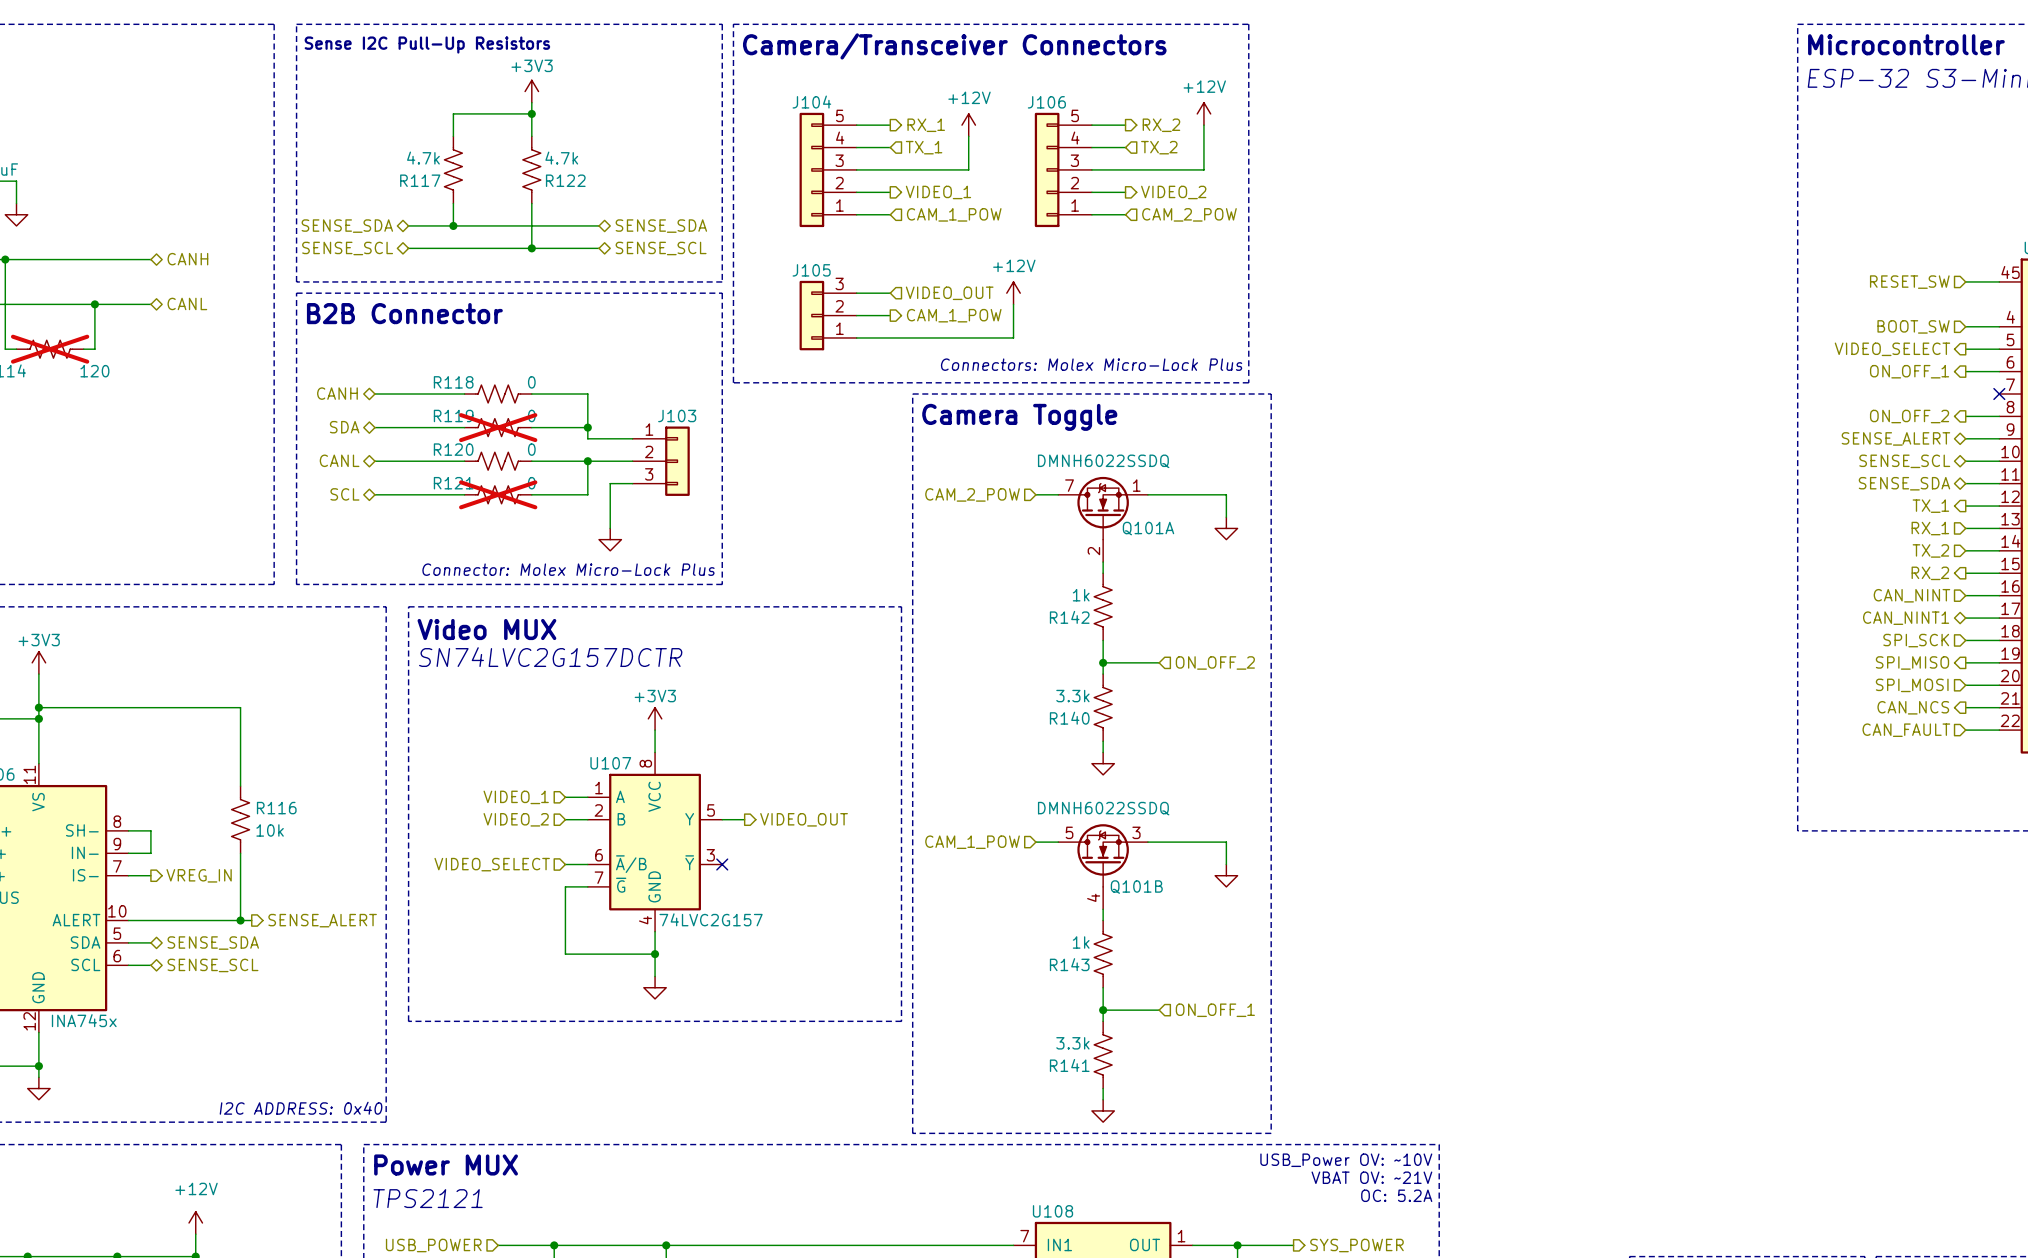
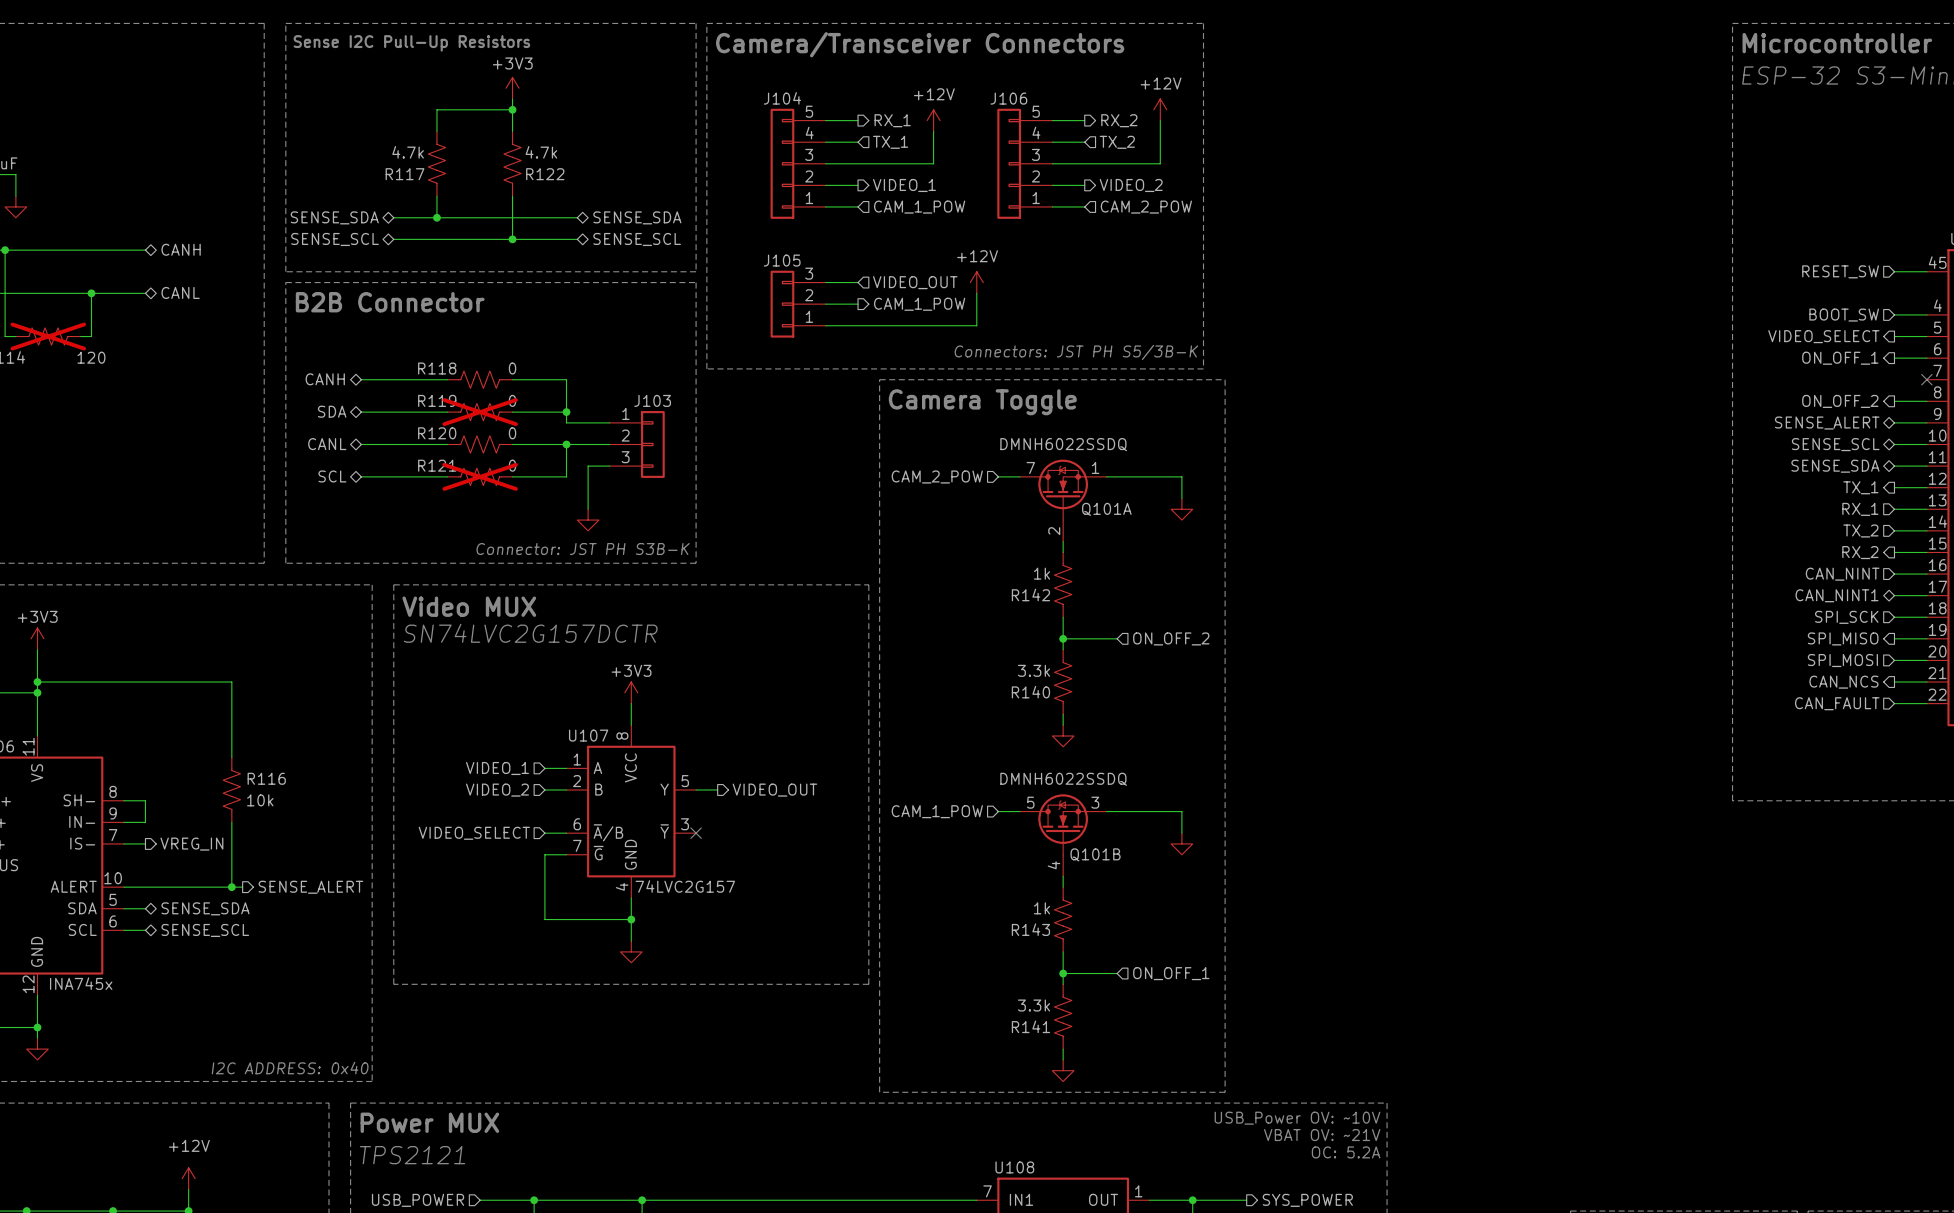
text: Connectors: Molex Micro-Lock Plus (1091, 364) -> Connectors: JST PH S5/3B-K (1076, 352)
text: Connector: Molex Micro-Lock Plus (568, 569) -> Connector: JST PH S3B-K (583, 549)

